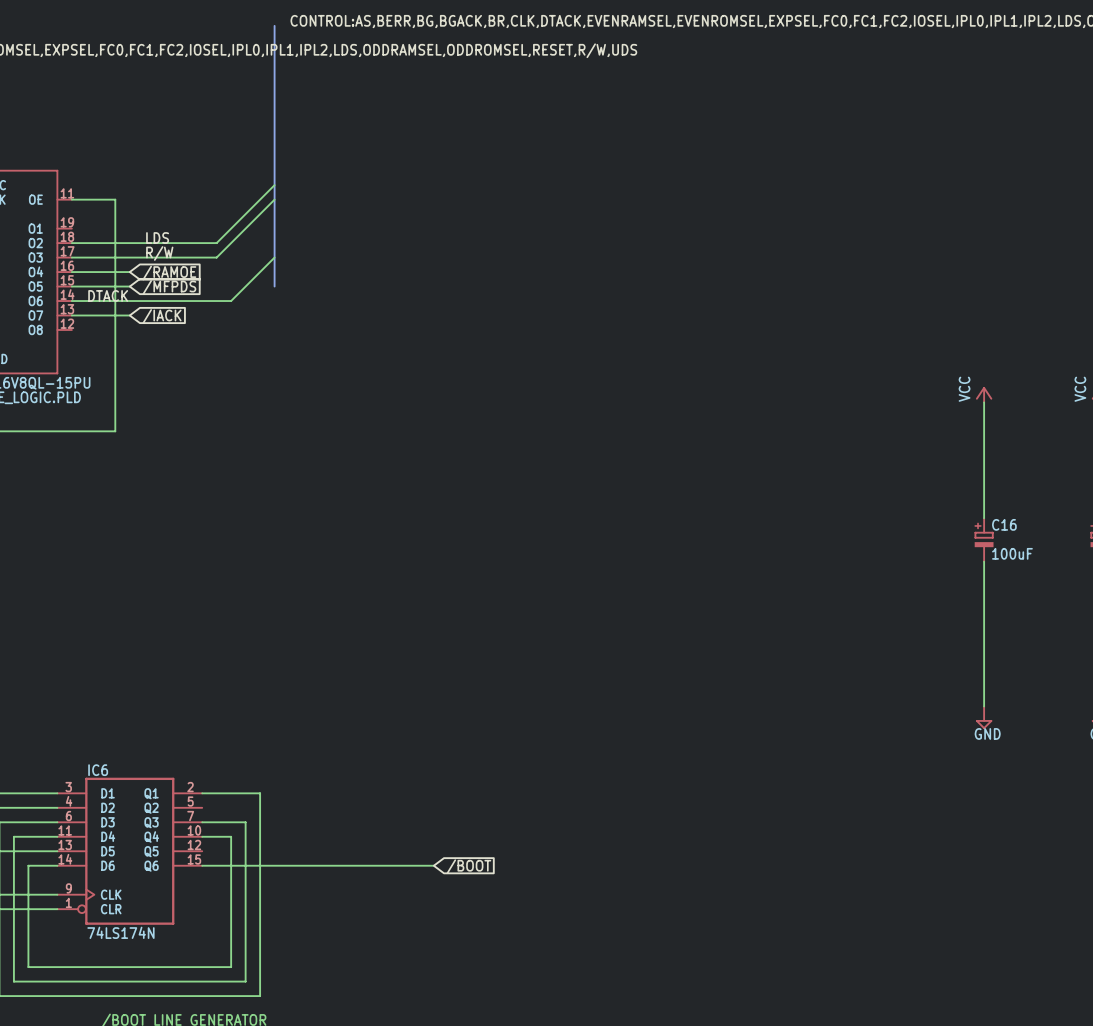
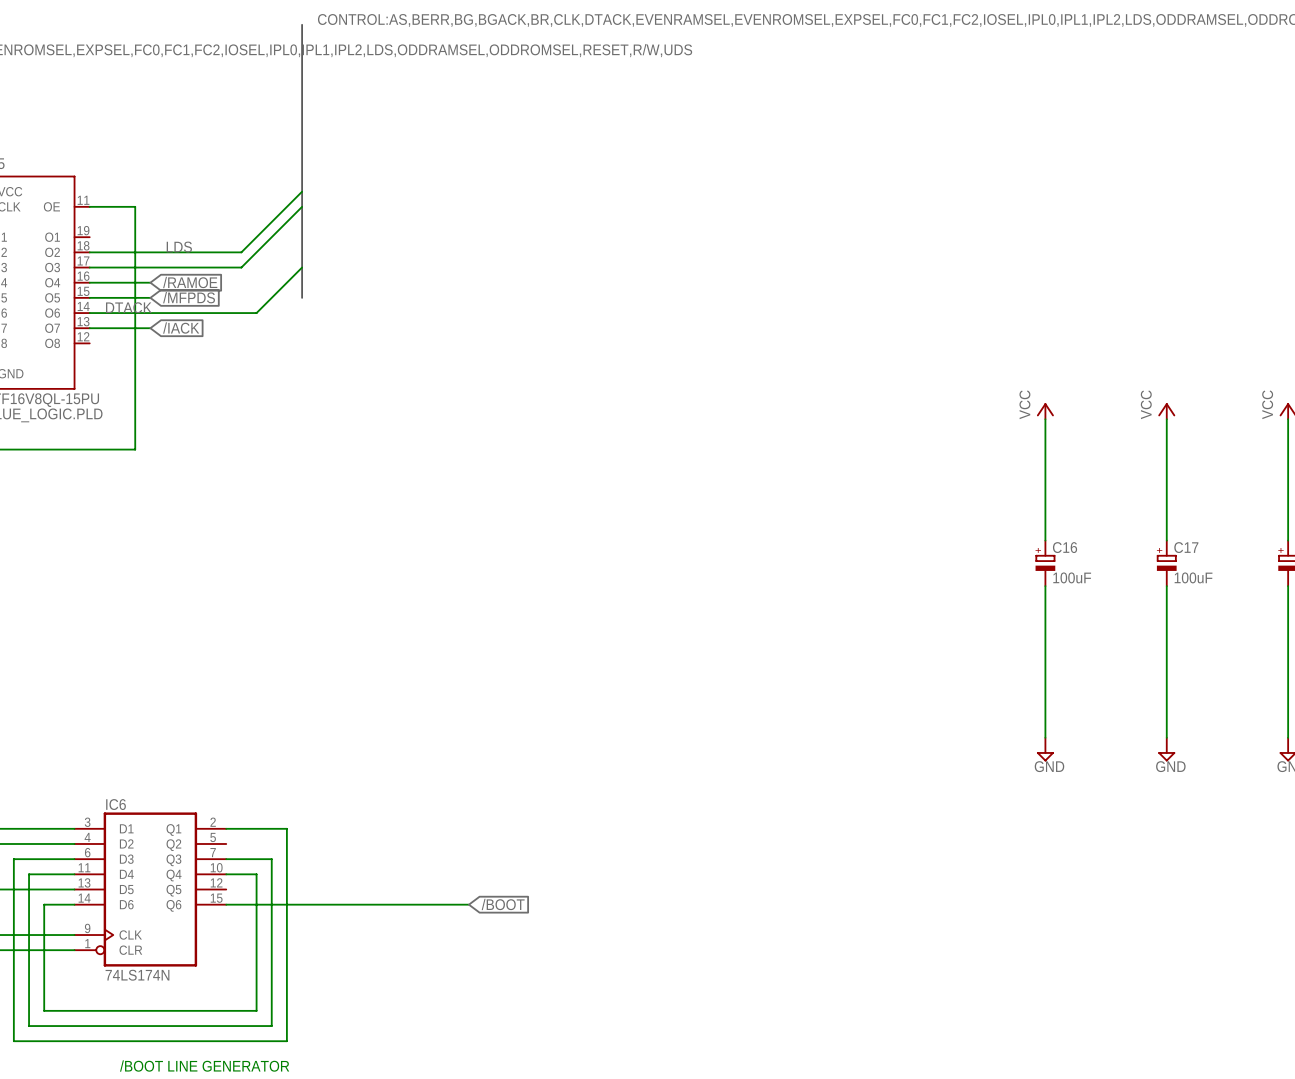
label: R/W (159, 253) -> none

